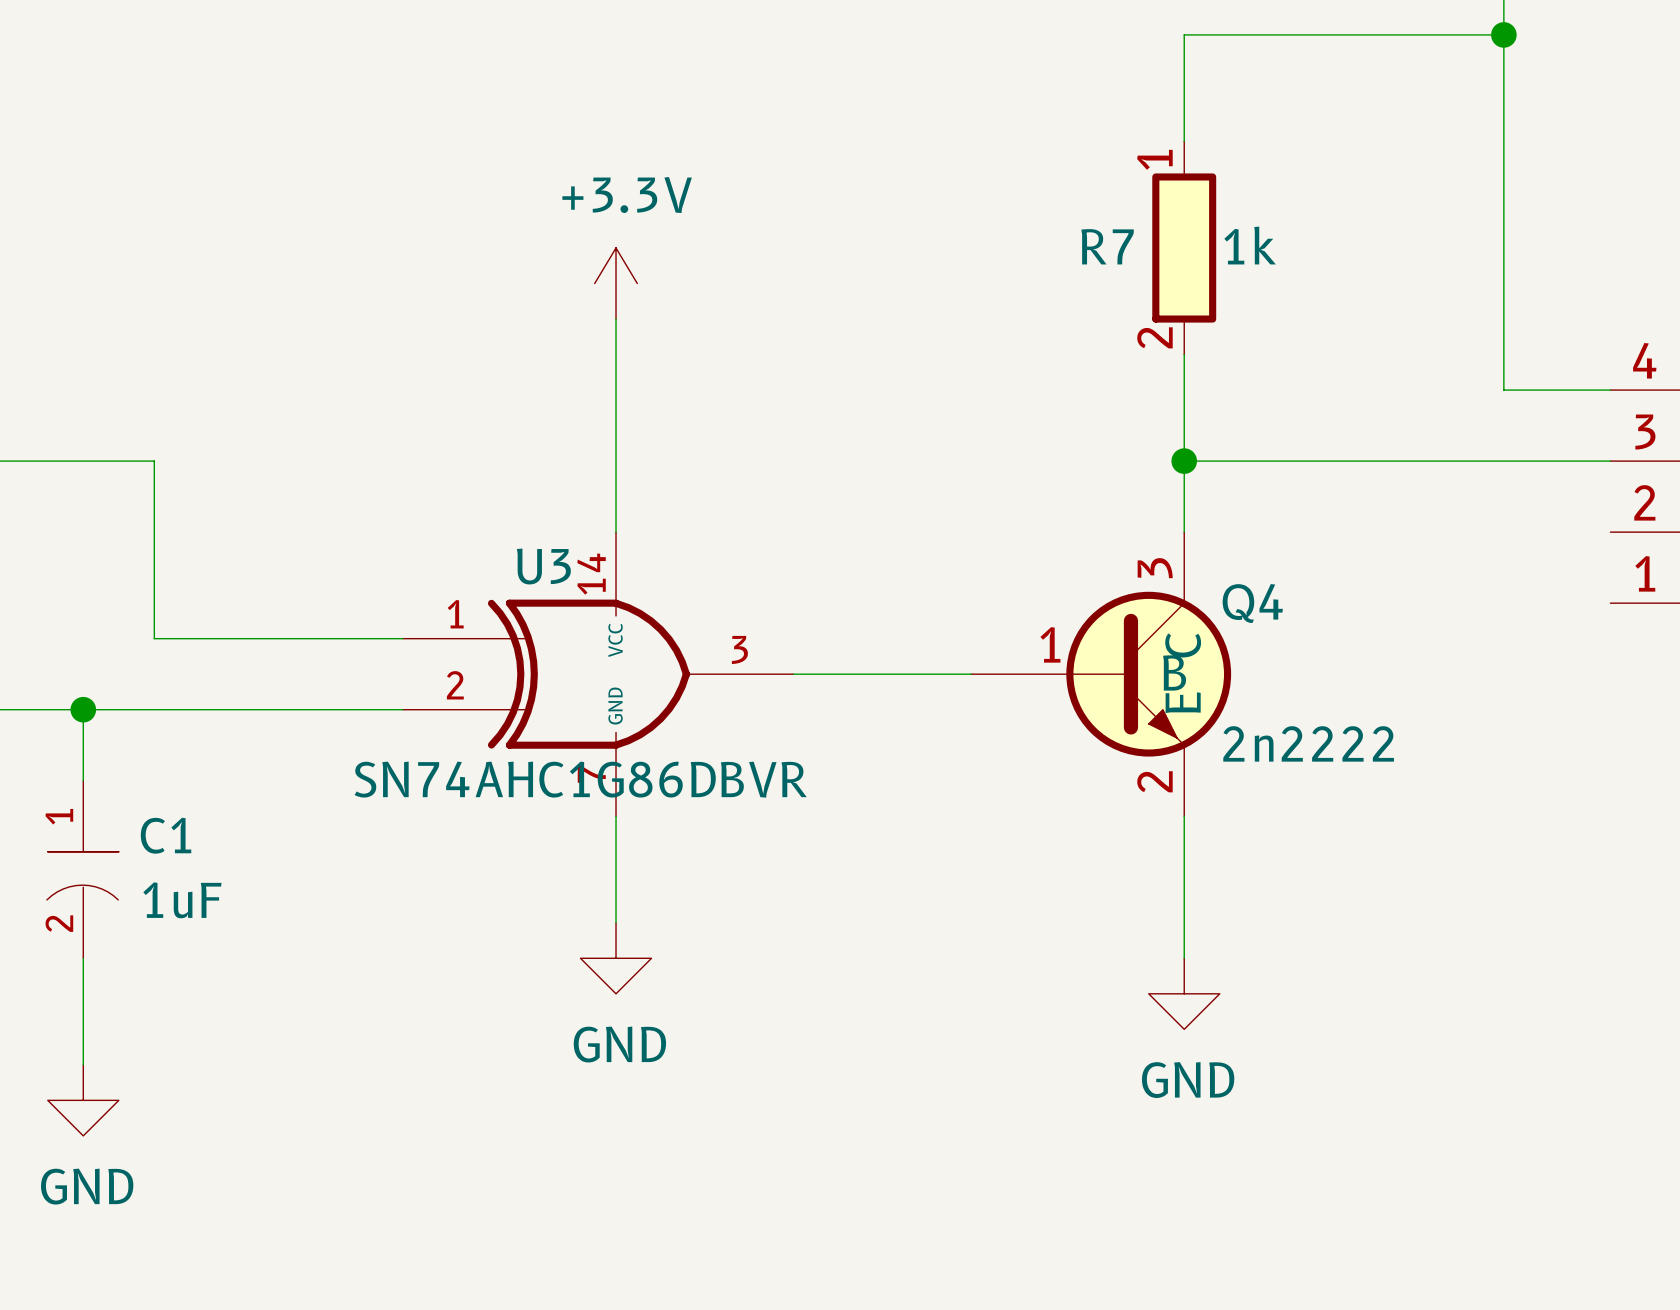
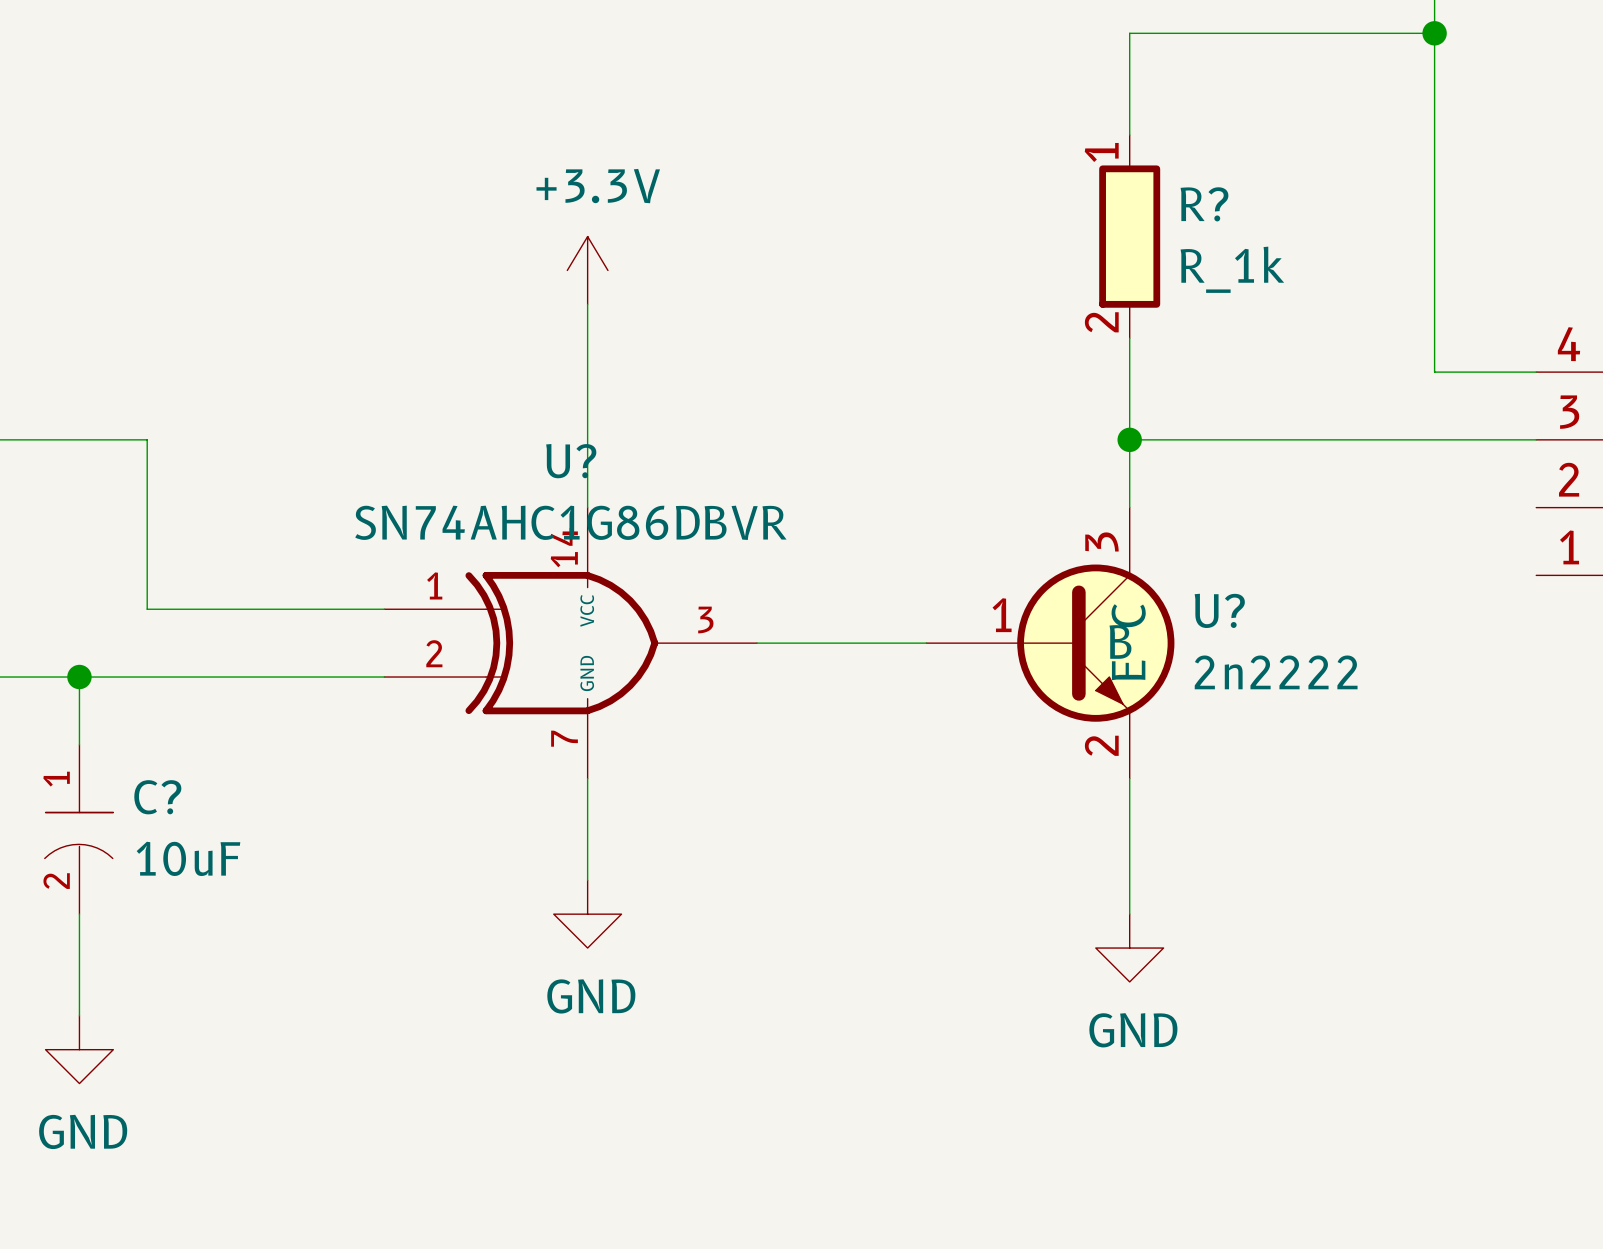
R7 value: 1k (1250, 245) -> R_1k (1232, 269)
R7 name: R7 (1107, 246) -> R? (1204, 204)
U3 name: U3 (543, 566) -> U? (571, 461)
Q4 name: Q4 (1252, 603) -> U? (1219, 610)
Q4 value position: 2n2222 (1308, 743) -> 2n2222 (1276, 672)
U3 value position: SN74AHC1G86DBVR (580, 779) -> SN74AHC1G86DBVR (570, 522)
C1 name: C1 (166, 835) -> C? (157, 797)
C1 value: 1uF (182, 900) -> 10uF (188, 858)

